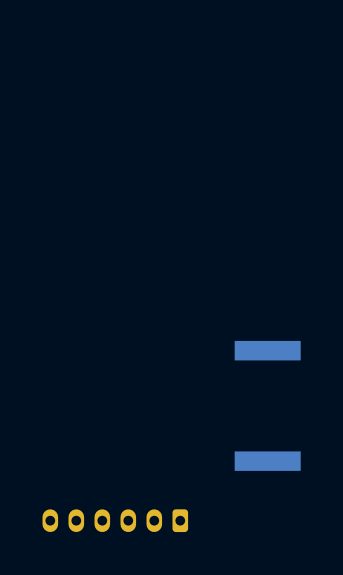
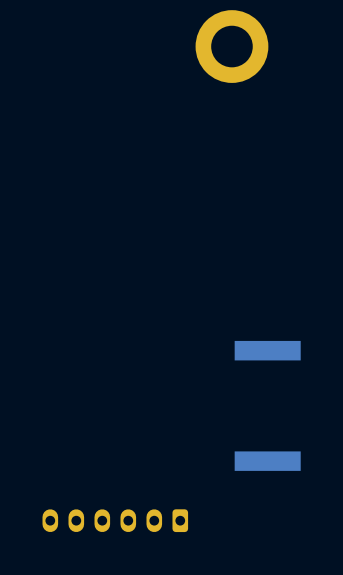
part: none -> (231, 46)

